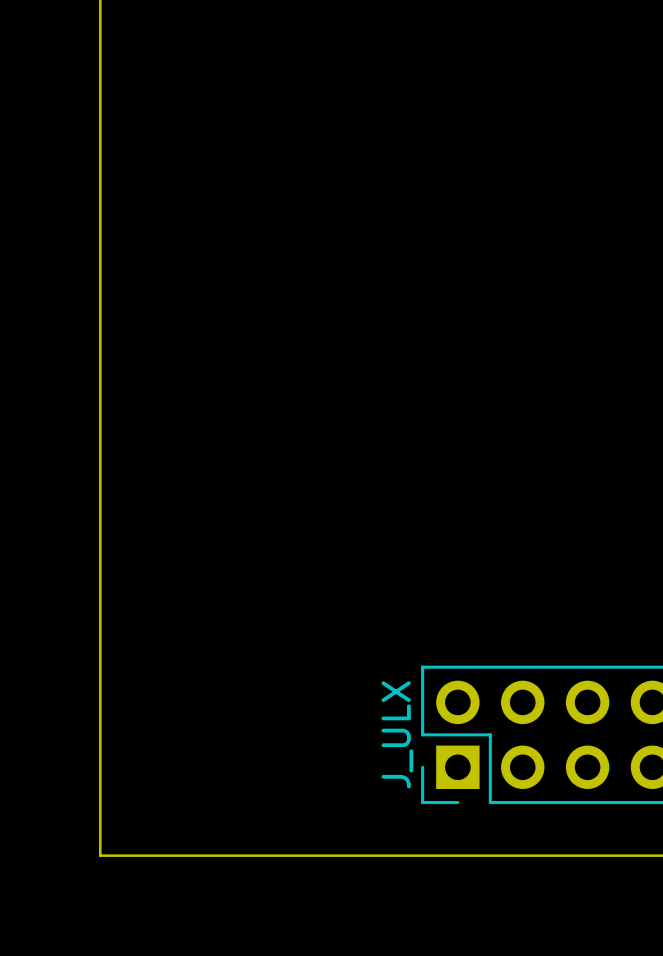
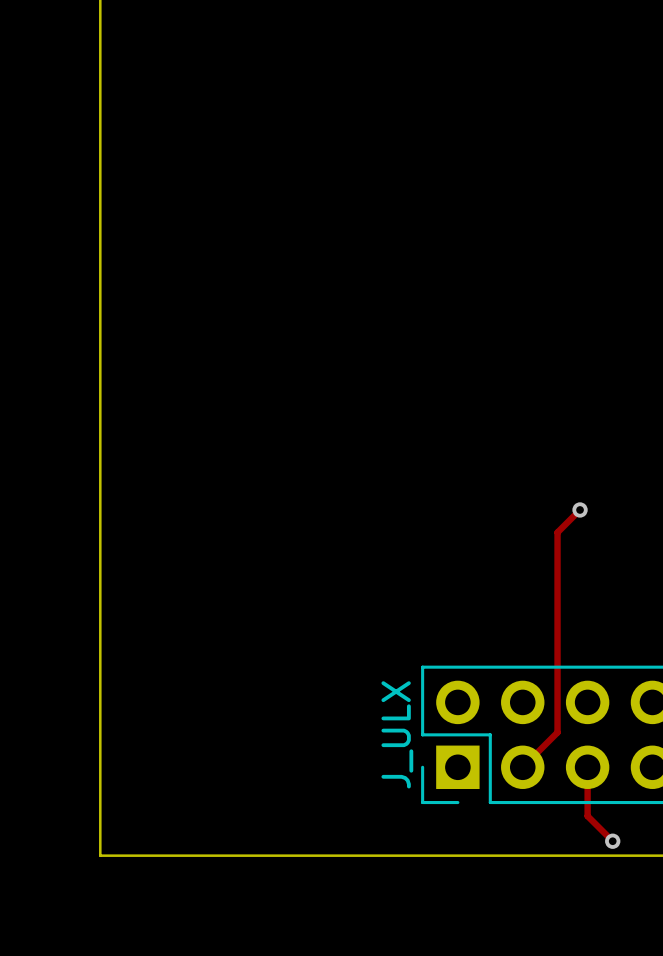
track: none -> (580, 509) (557, 532) (557, 732) (522, 767)
via: none -> (580, 509)
track: none -> (587, 767) (587, 816) (612, 841)
via: none -> (612, 841)

